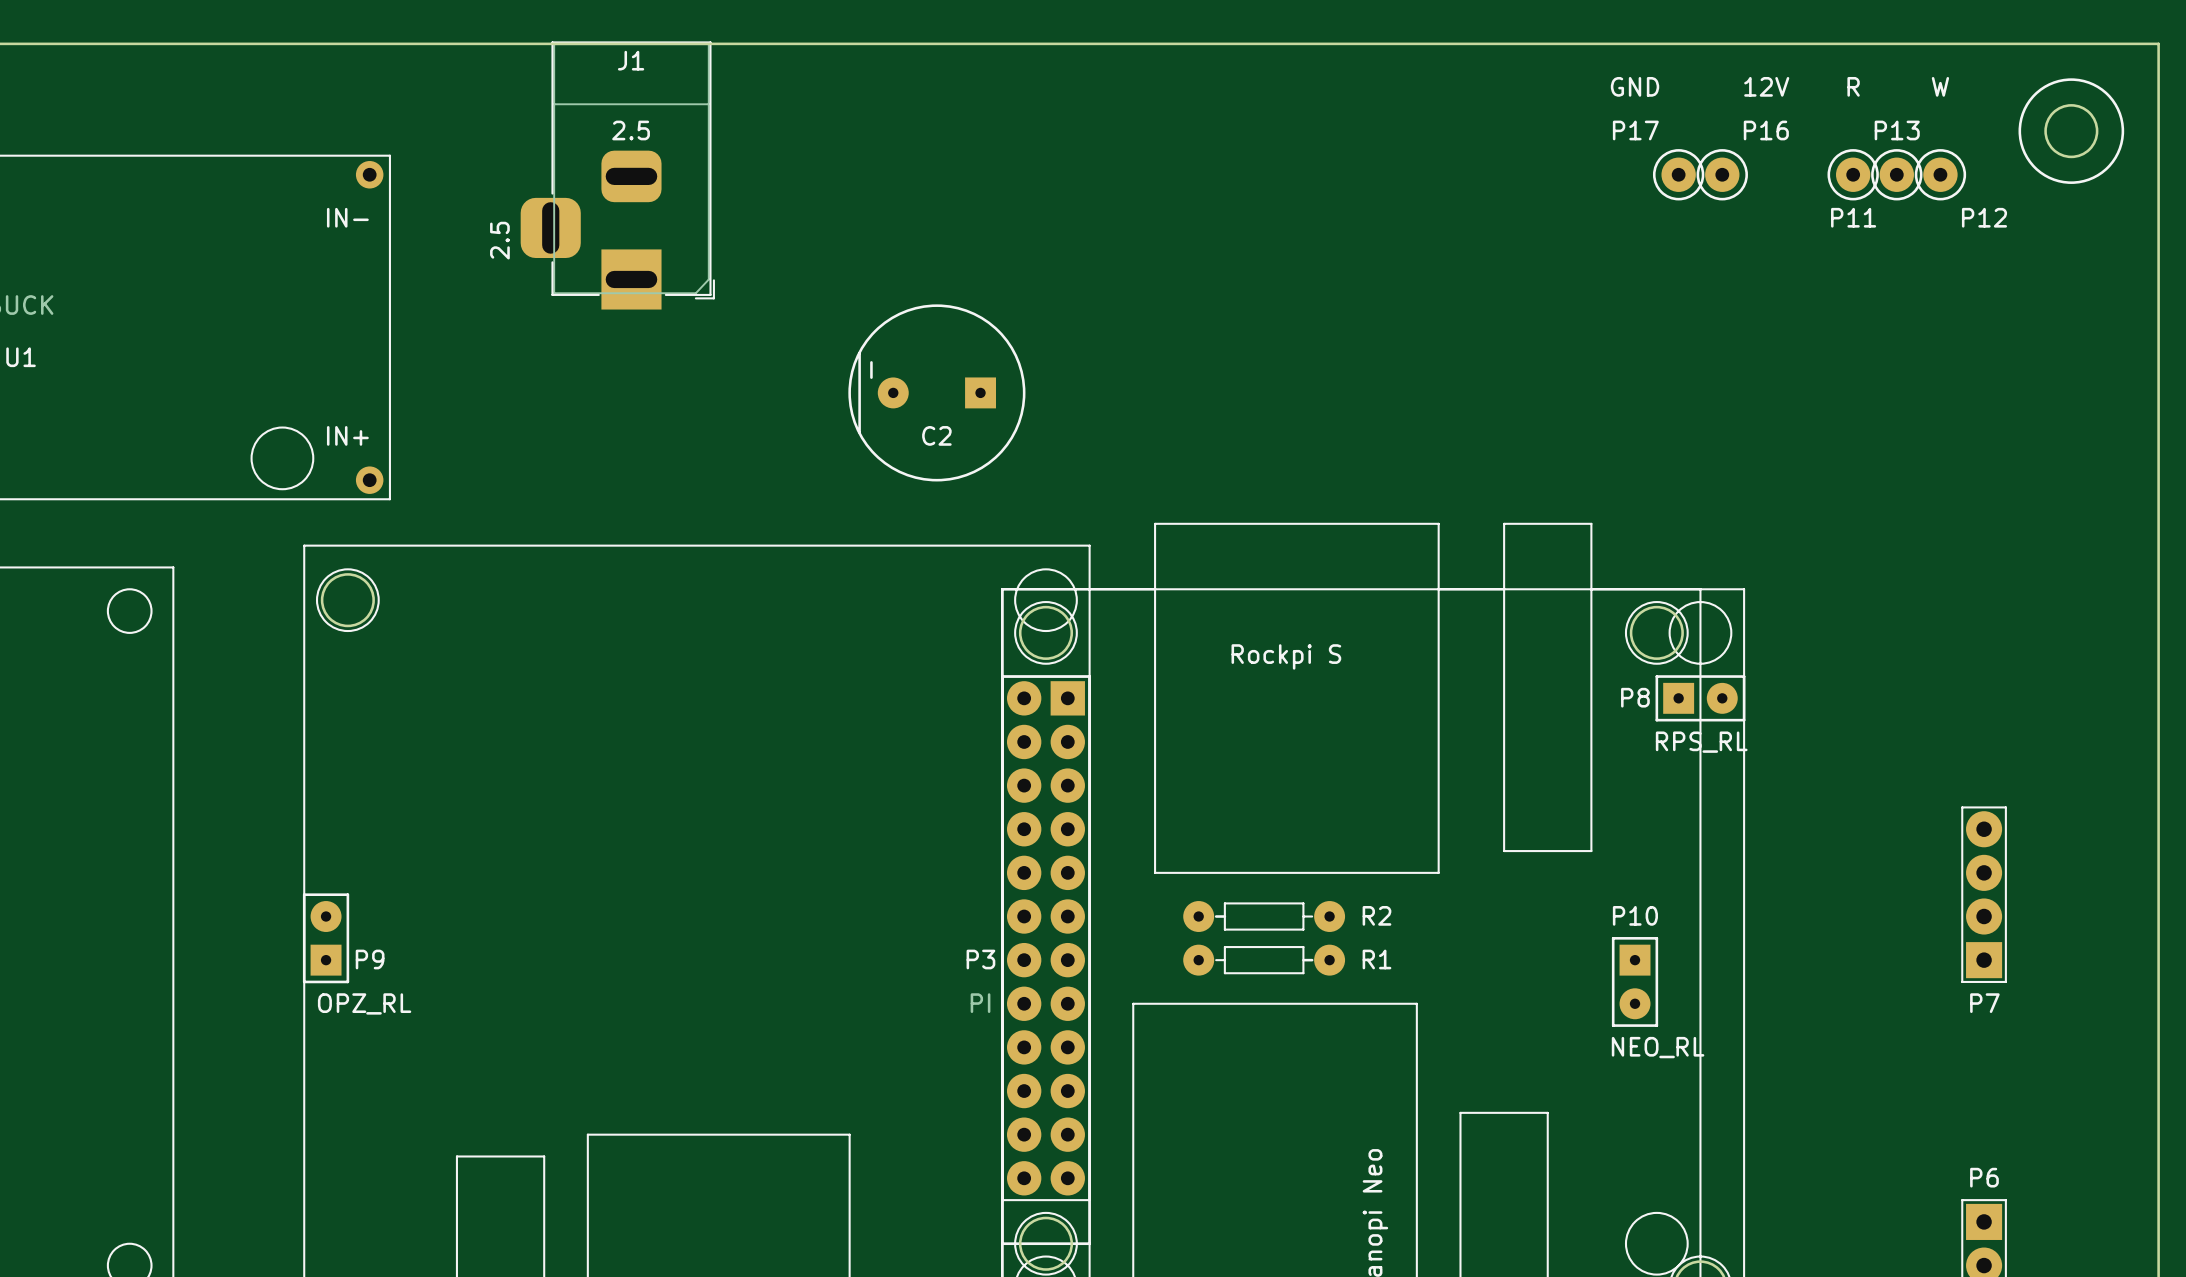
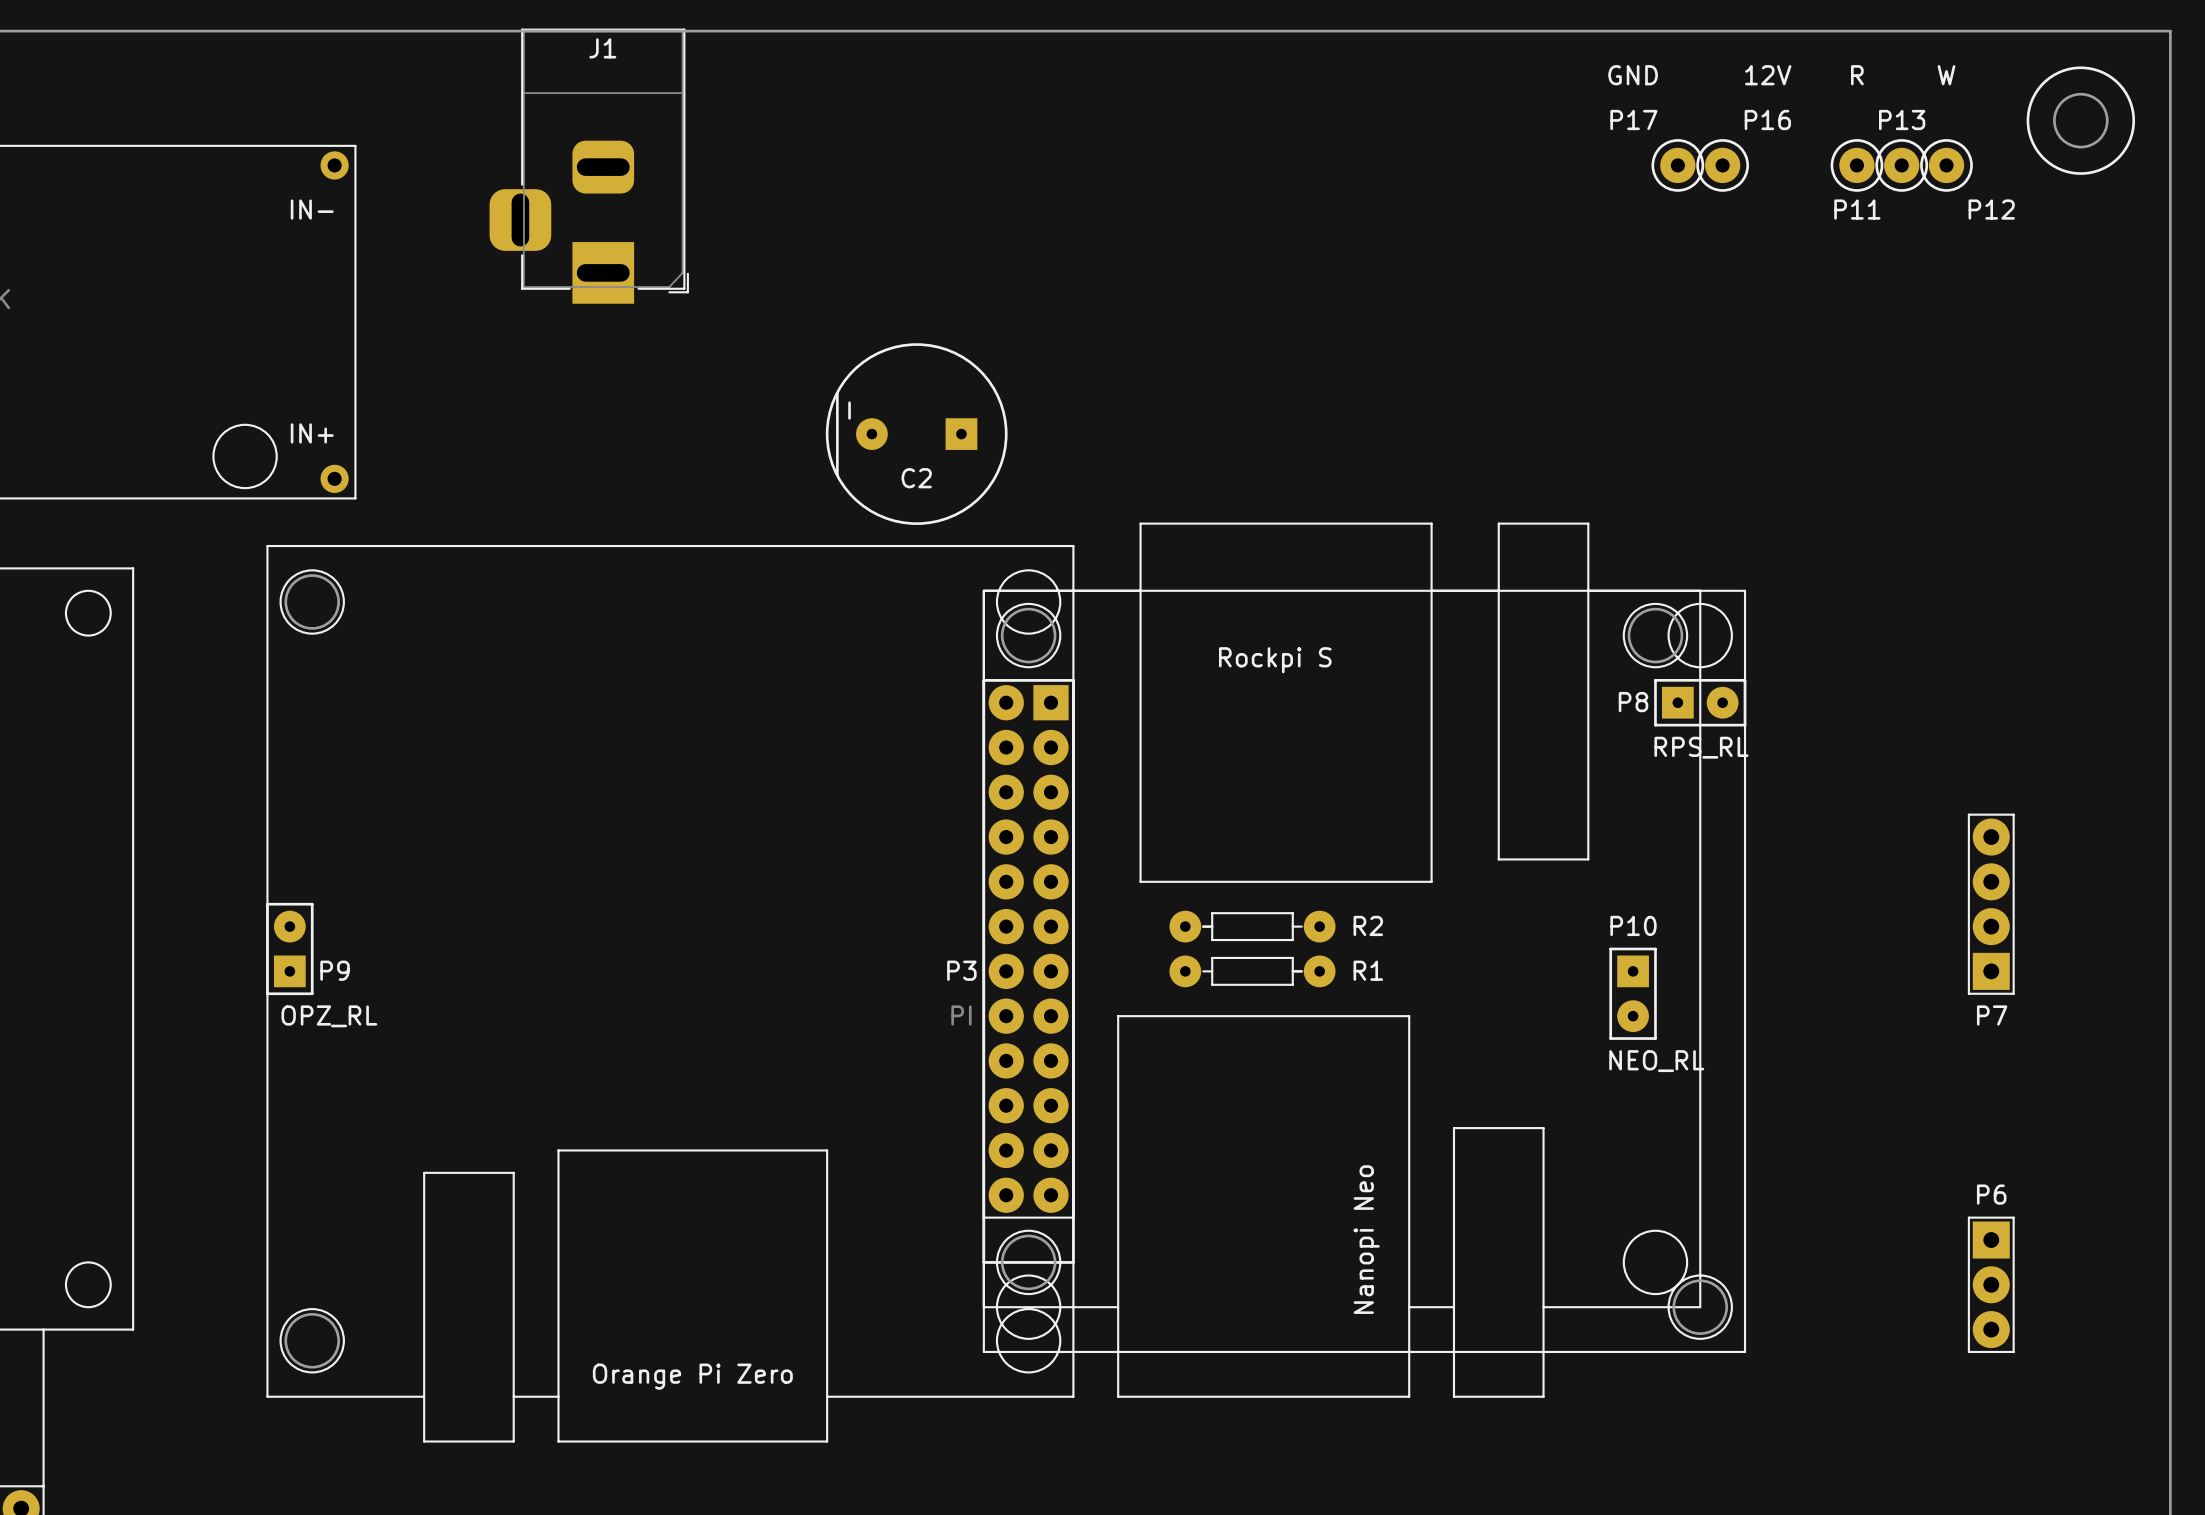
text: 2.5 (631, 130) -> none
text: 2.5 (499, 240) -> none
C2 position: (936, 392) -> (916, 434)

